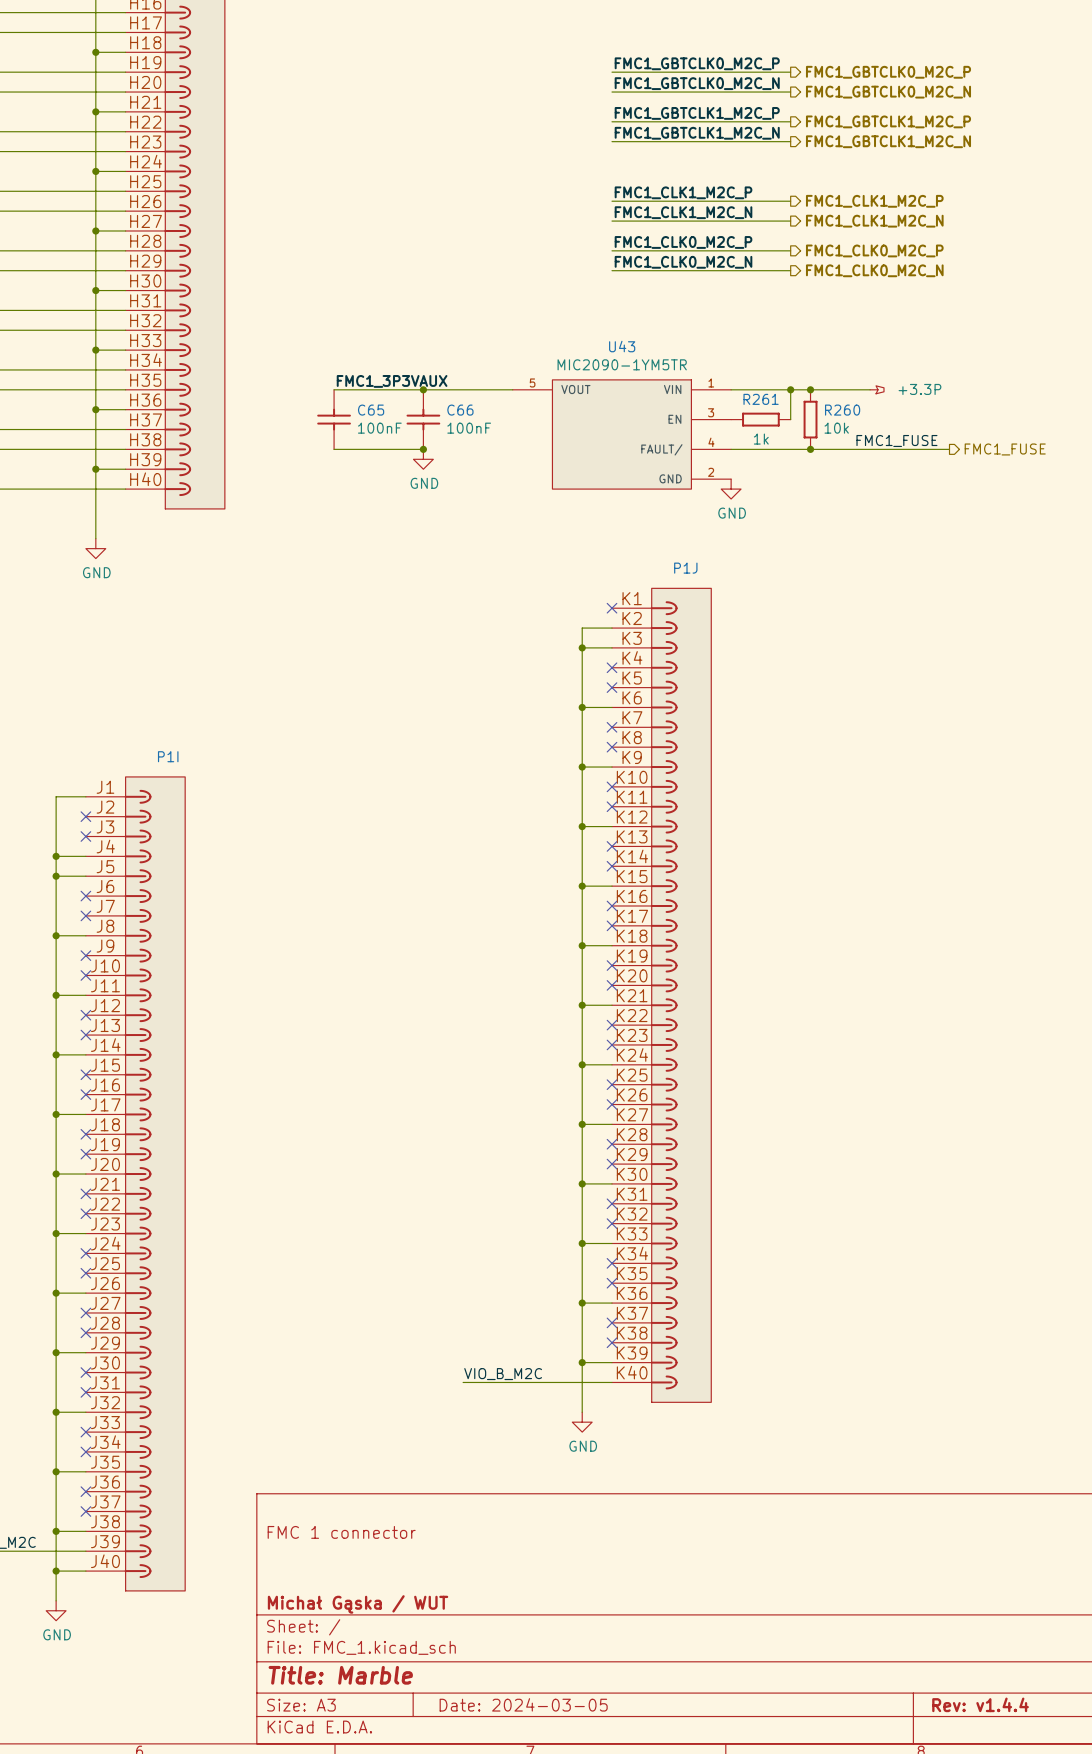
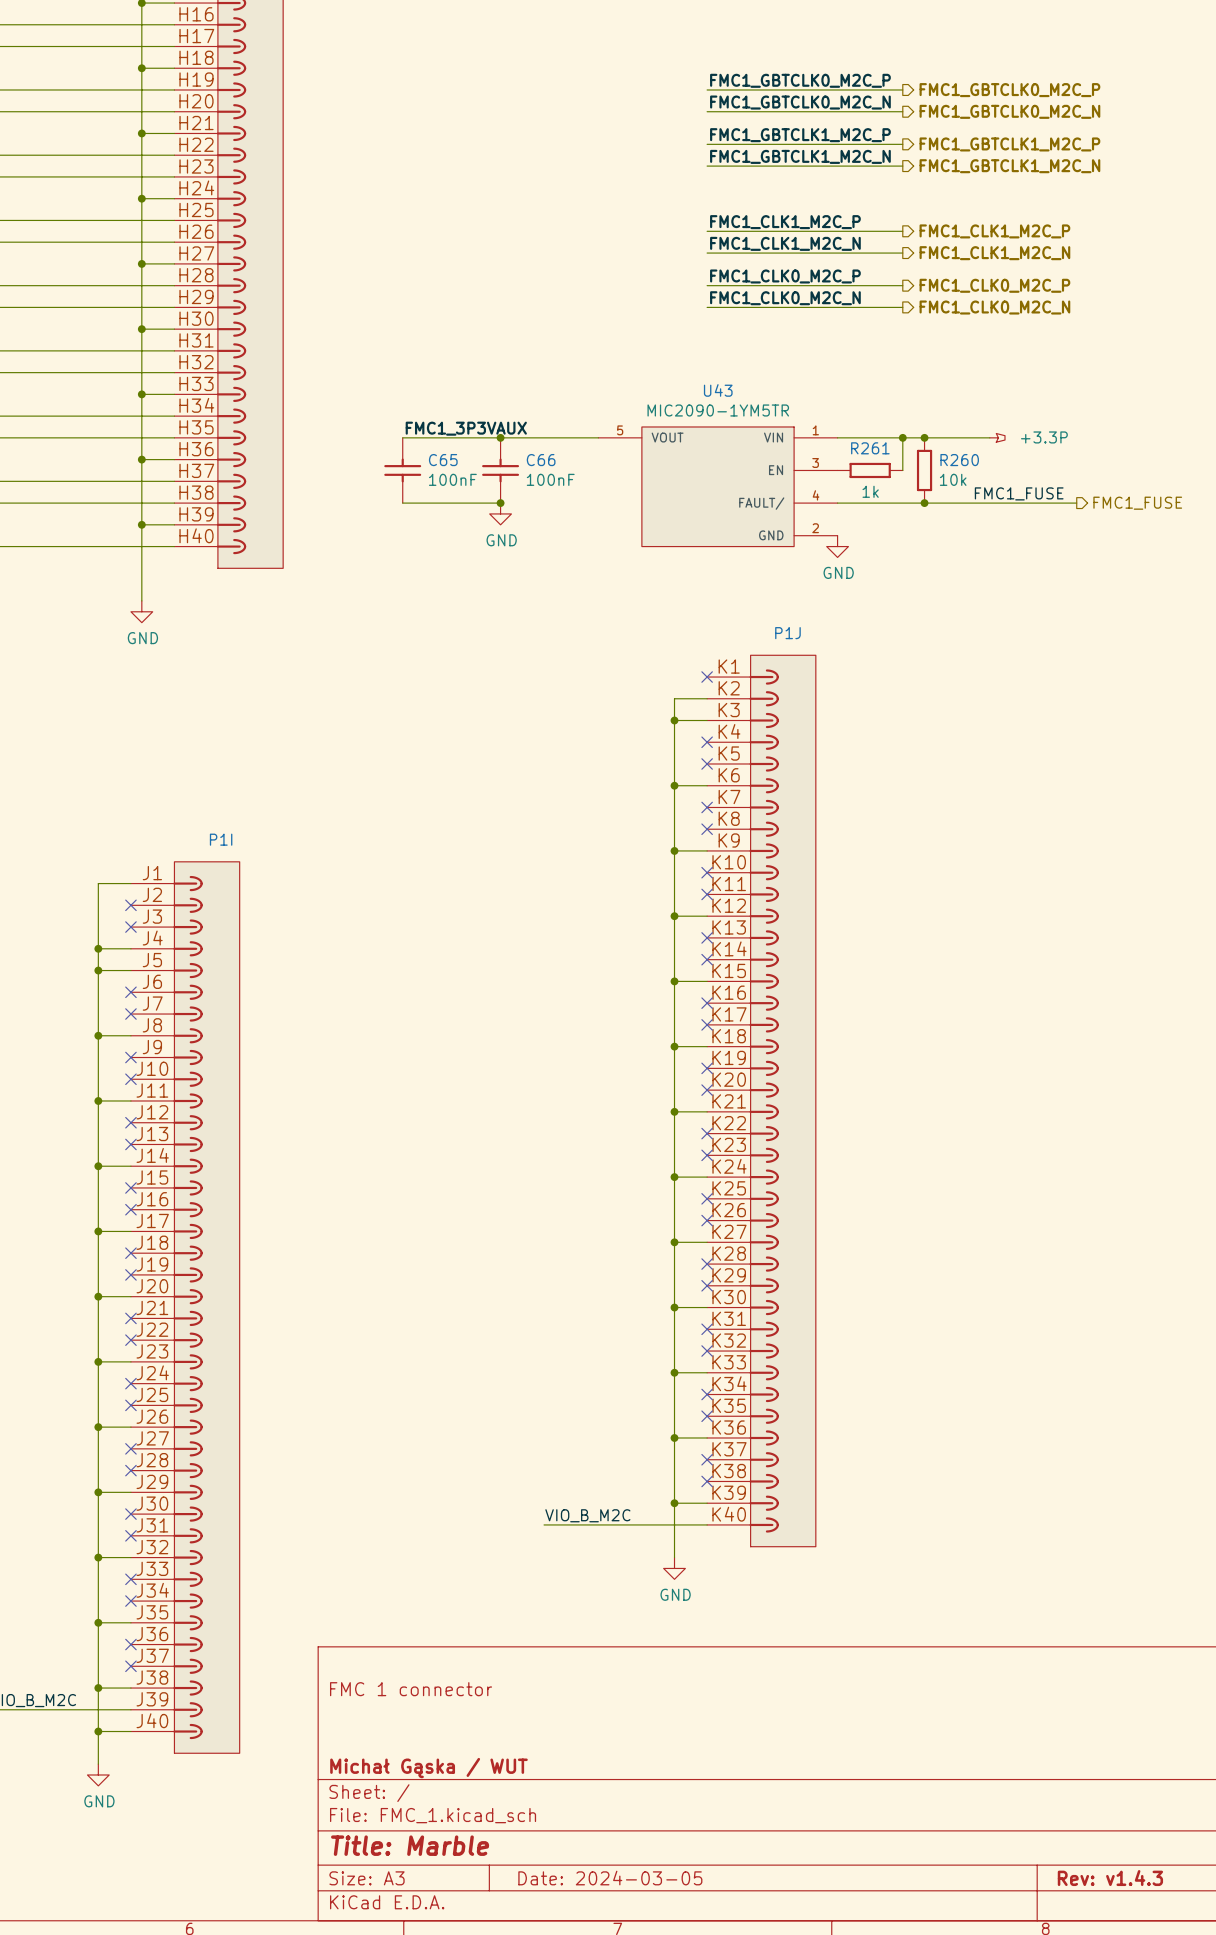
title block: Rev: v1.4.4 (980, 1704) -> Rev: v1.4.3 (1110, 1878)

